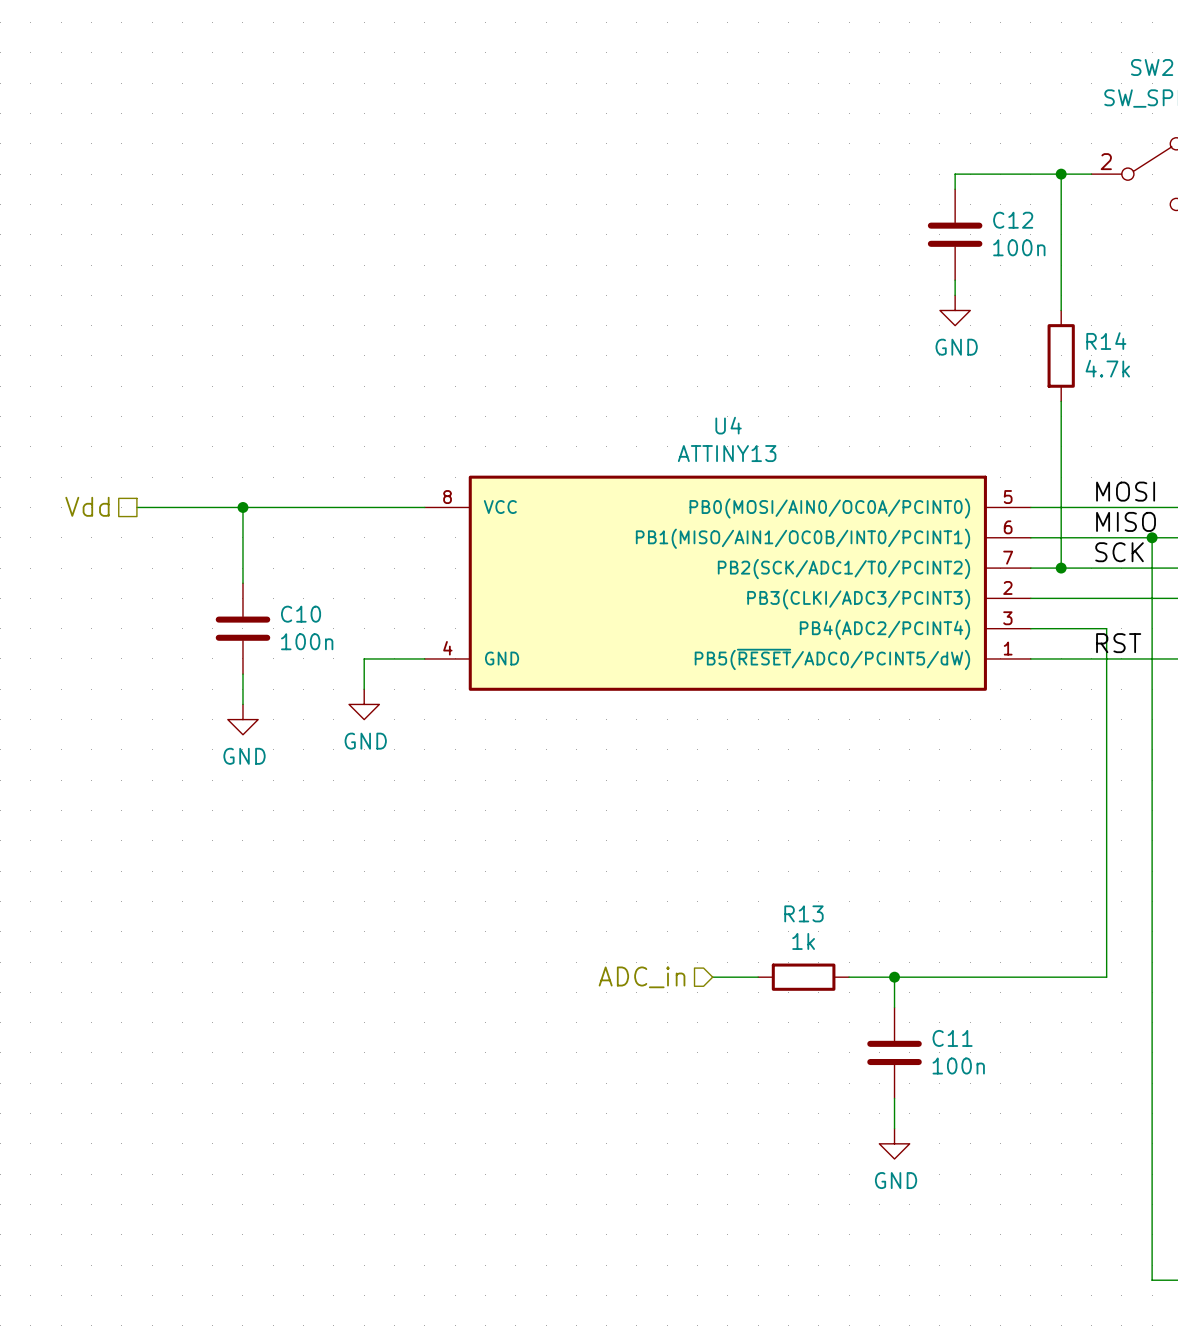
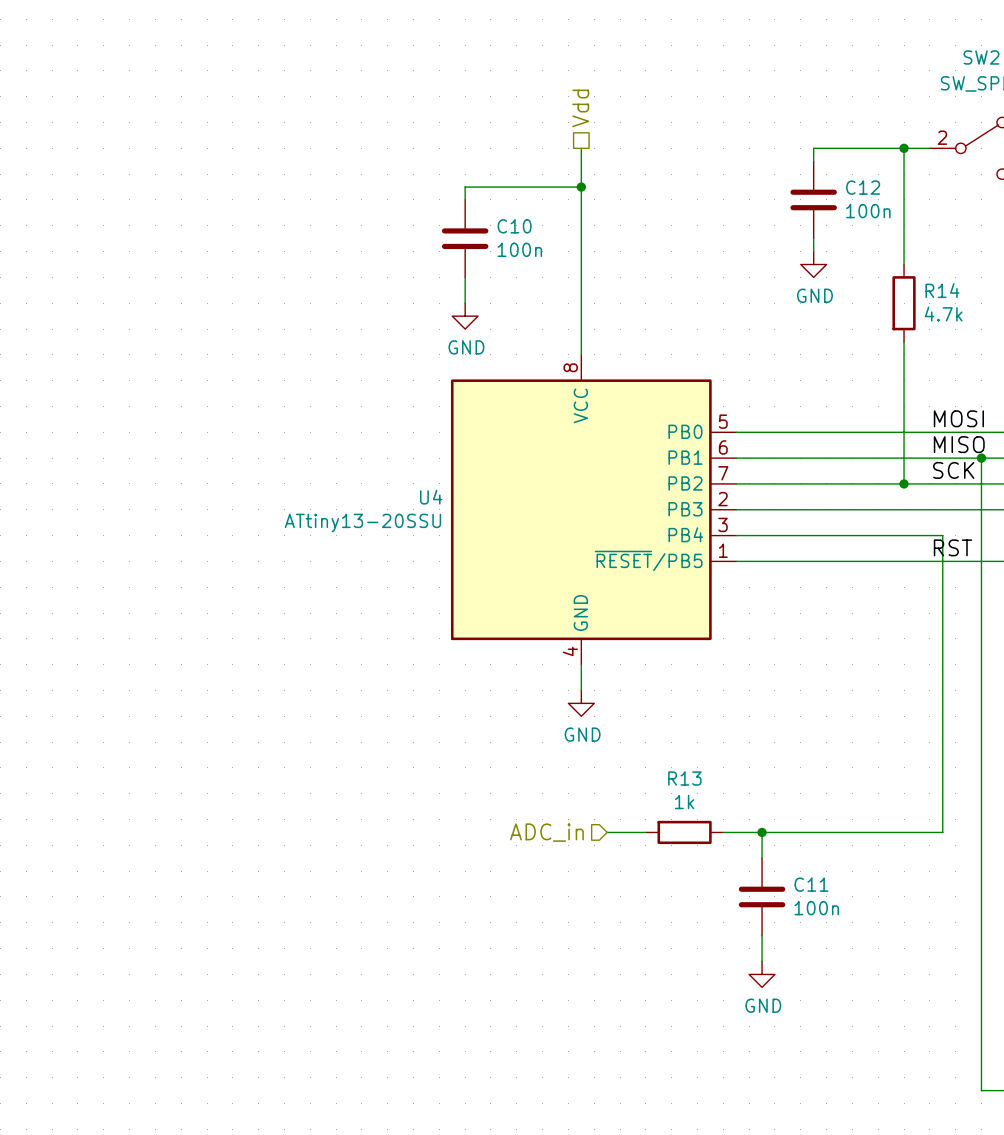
hierarchical label: none -> Vdd (580, 108)
wire: none -> (581, 148) (581, 354)
wire: none -> (581, 187) (465, 187) (465, 199)
junction: none -> (581, 187)
wire: none -> (465, 277) (465, 303)
power symbol: none -> GND (465, 316)
U4 name position: U4 (728, 425) -> U4 (431, 497)
U4 value: ATTINY13 (727, 453) -> ATtiny13-20SSU (362, 523)
U4 symbol: [424, 475, 1031, 691] -> [450, 354, 737, 665]
hierarchical label: Vdd (87, 506) -> none
wire: (136, 507) (424, 507) -> none
wire: (242, 507) (242, 583) -> none
junction: (242, 507) -> none
C10 position: (242, 628) -> (465, 238)
wire: (424, 658) (364, 658) (364, 689) -> none
wire: (242, 674) (242, 704) -> none
power symbol: GND (364, 704) -> none
power symbol: GND (242, 719) -> none
wire: none -> (581, 664) (581, 690)
power symbol: none -> GND (581, 703)

